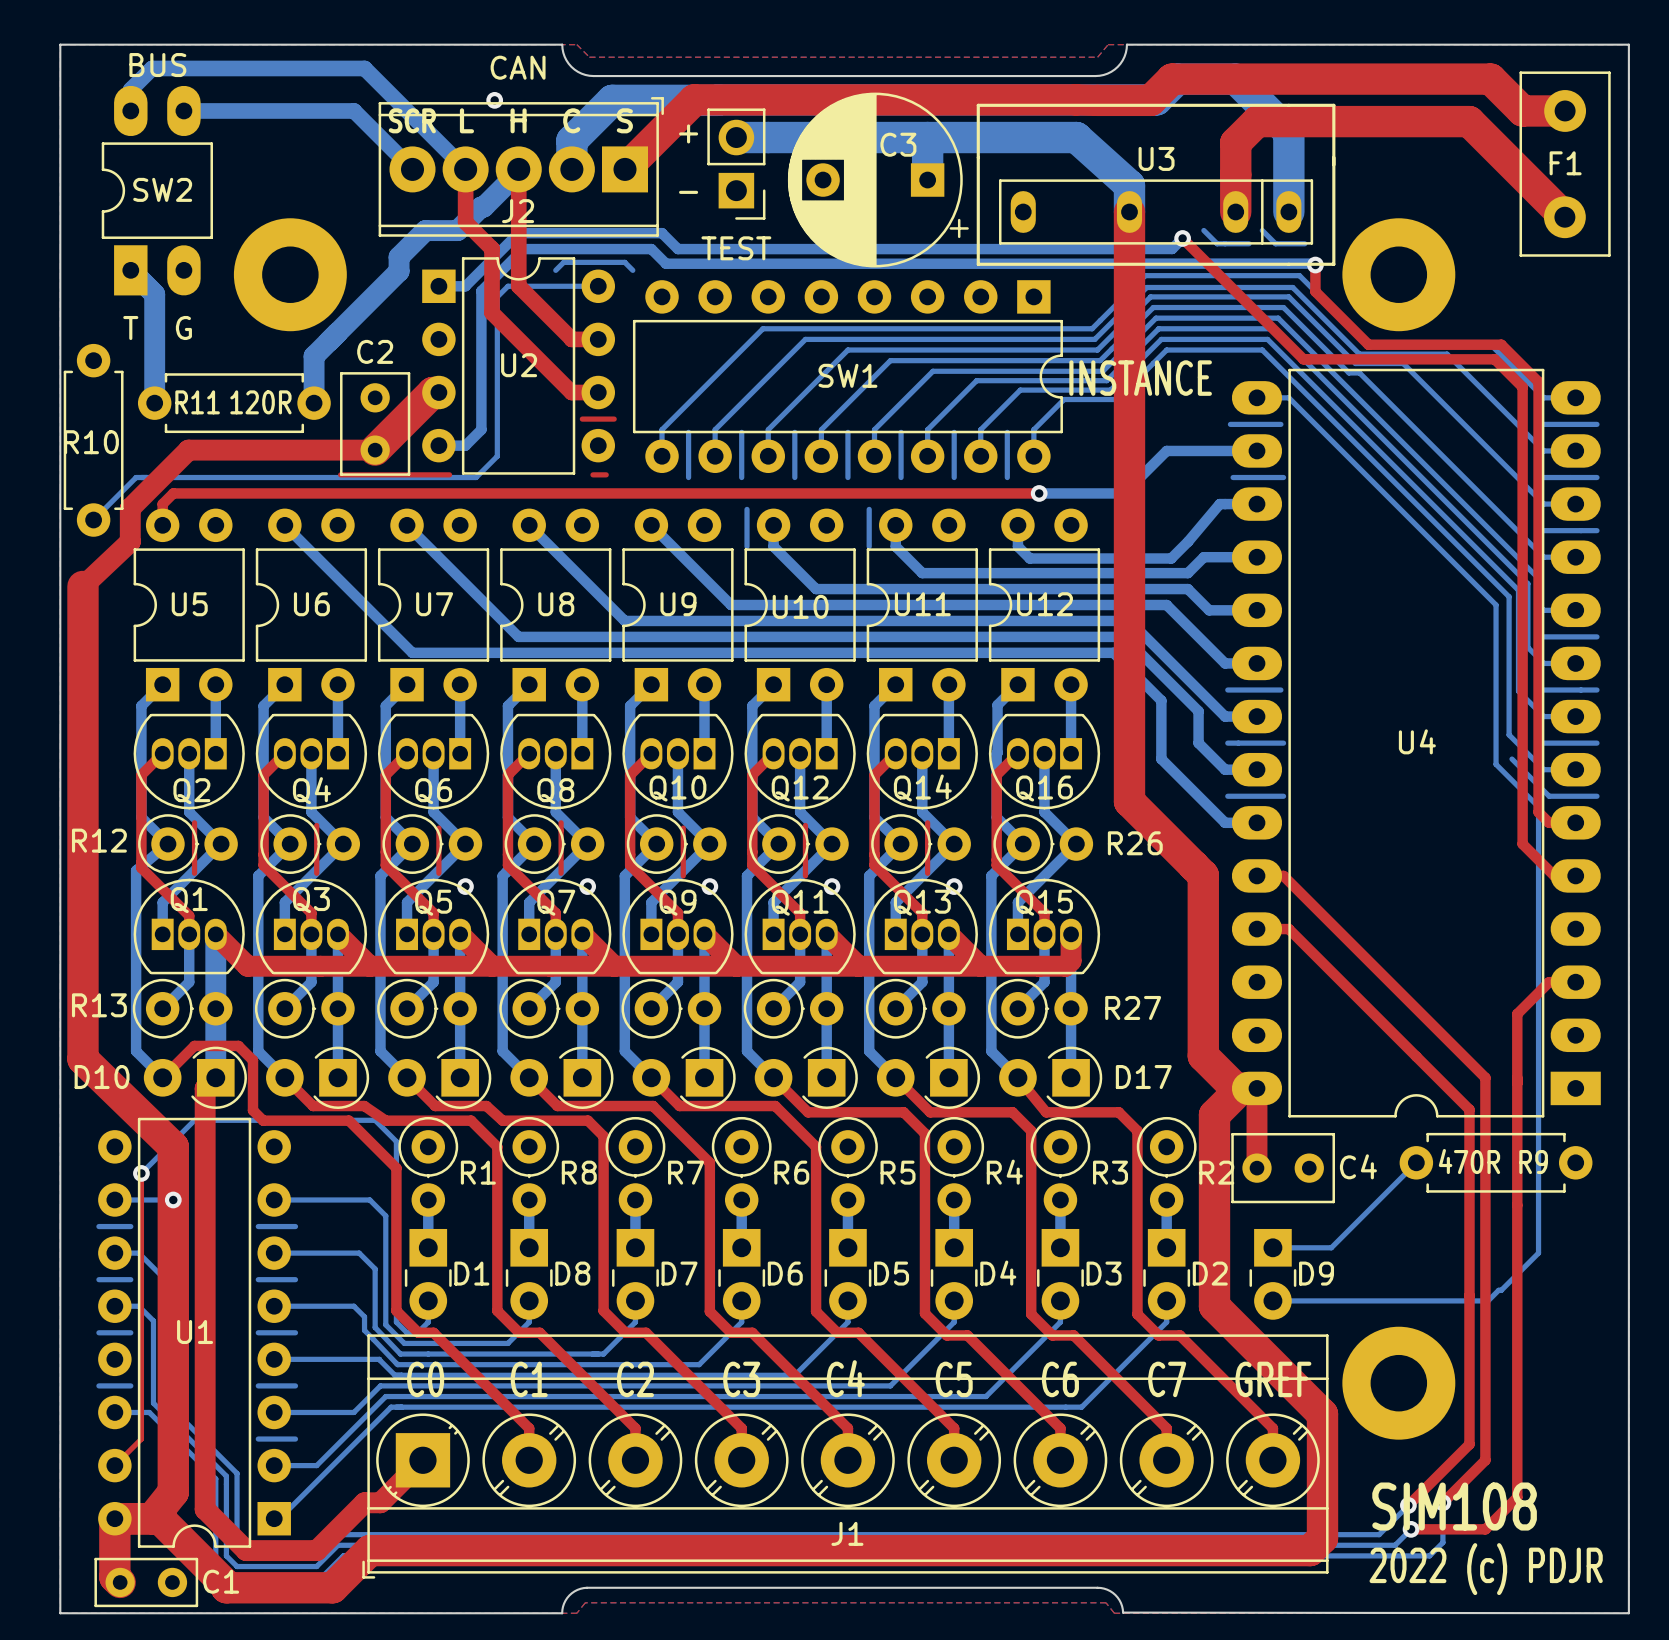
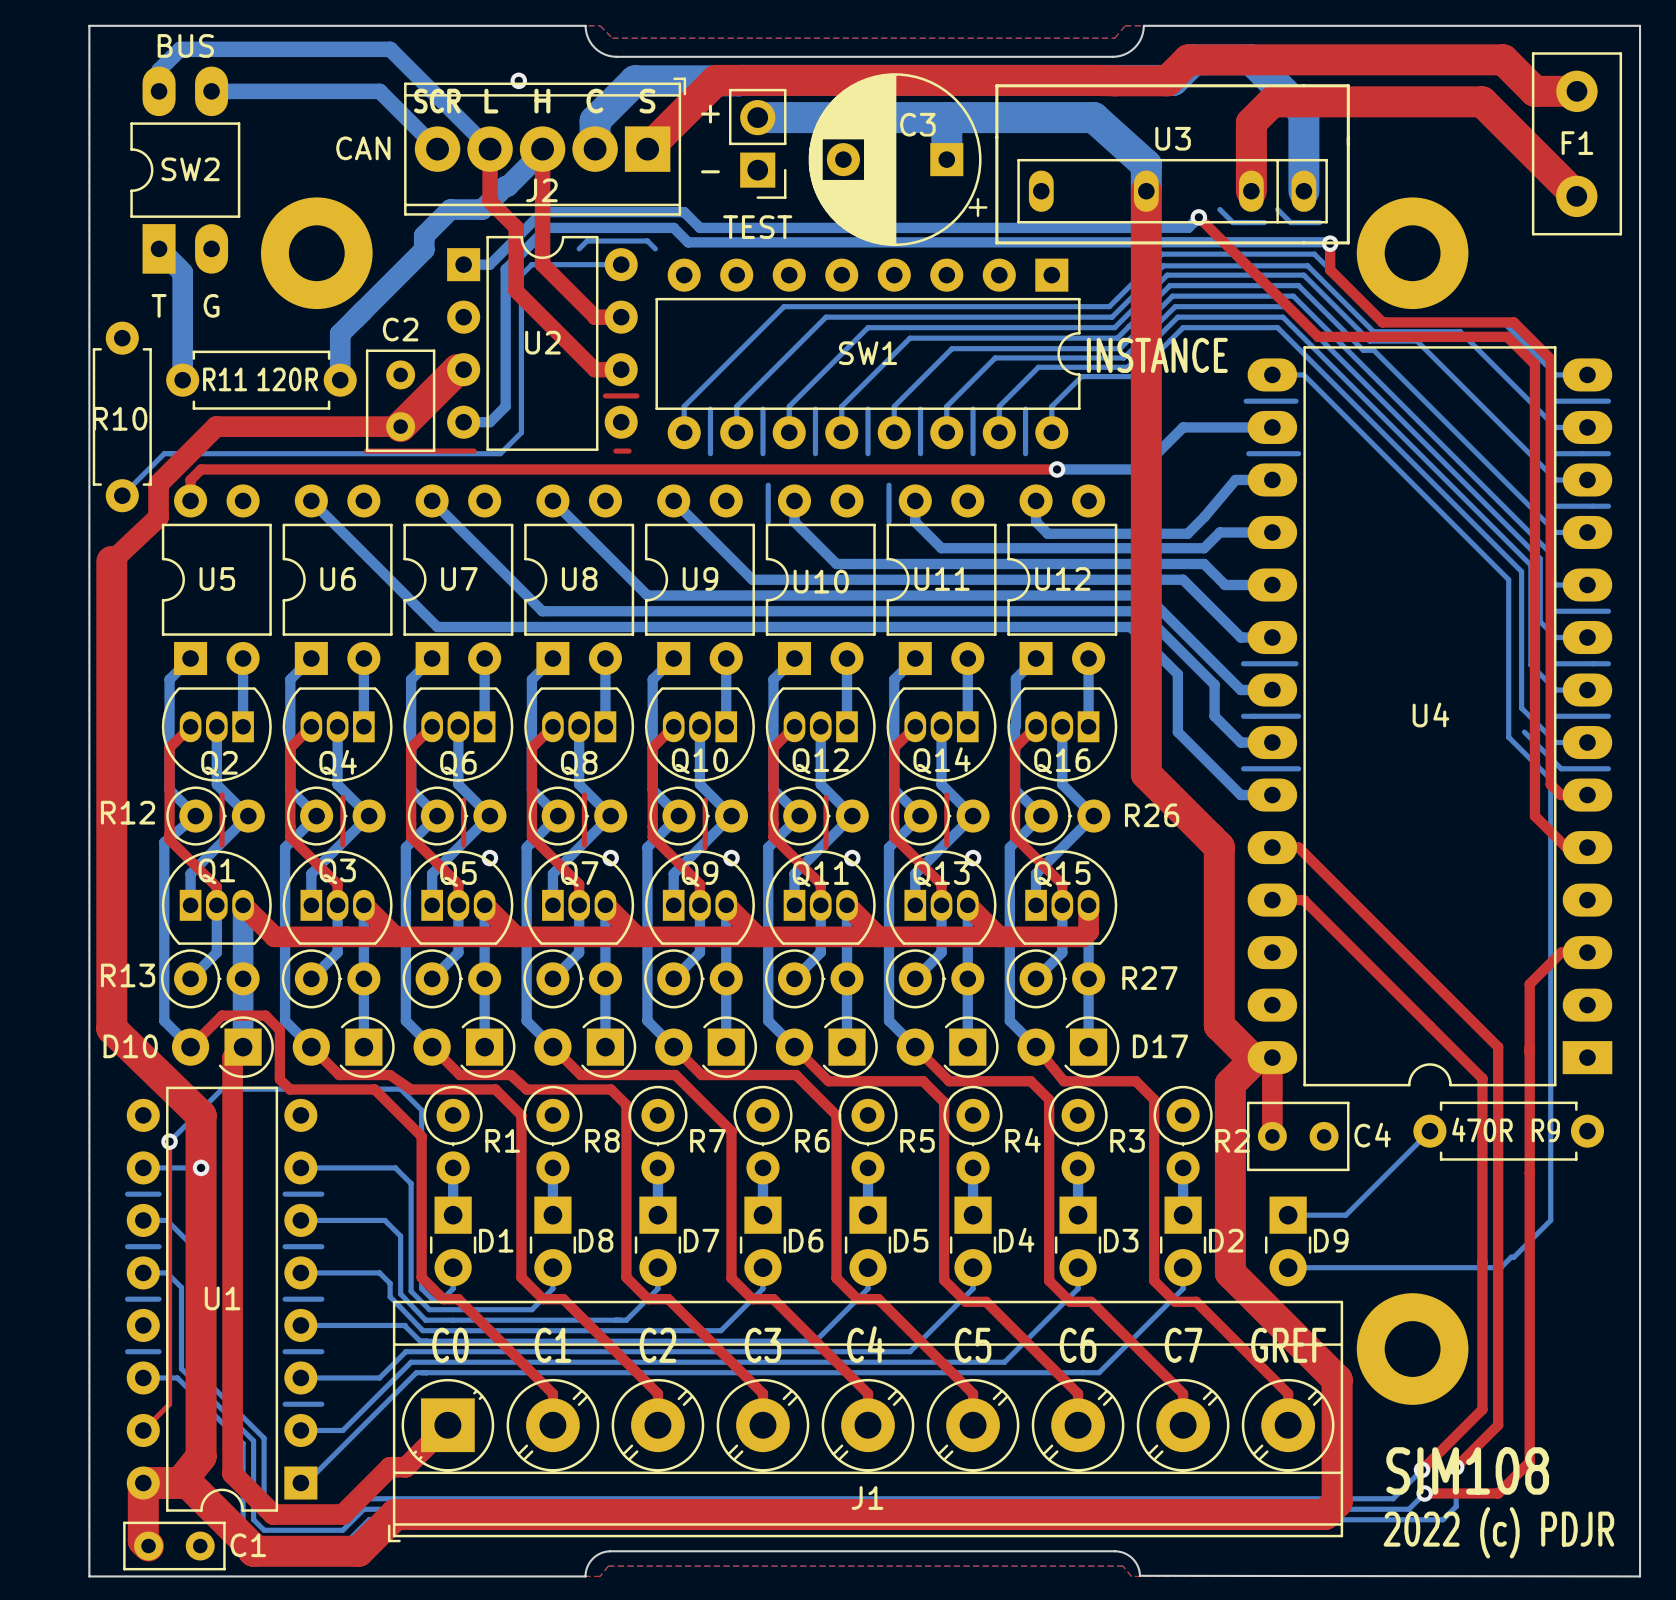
J2 value position: CAN (518, 67) -> CAN (363, 148)

